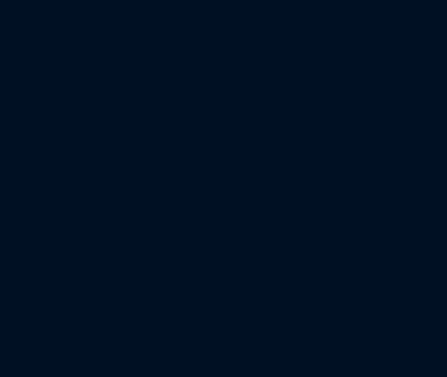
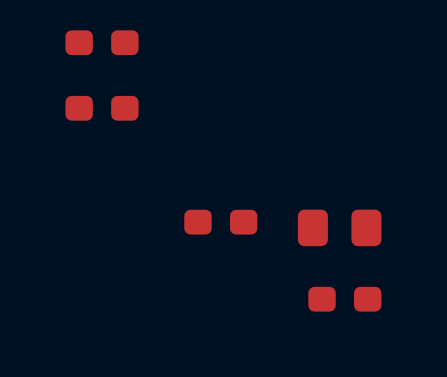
part: none -> (102, 42)
part: none -> (102, 108)
part: none -> (220, 222)
part: none -> (339, 227)
part: none -> (344, 299)

